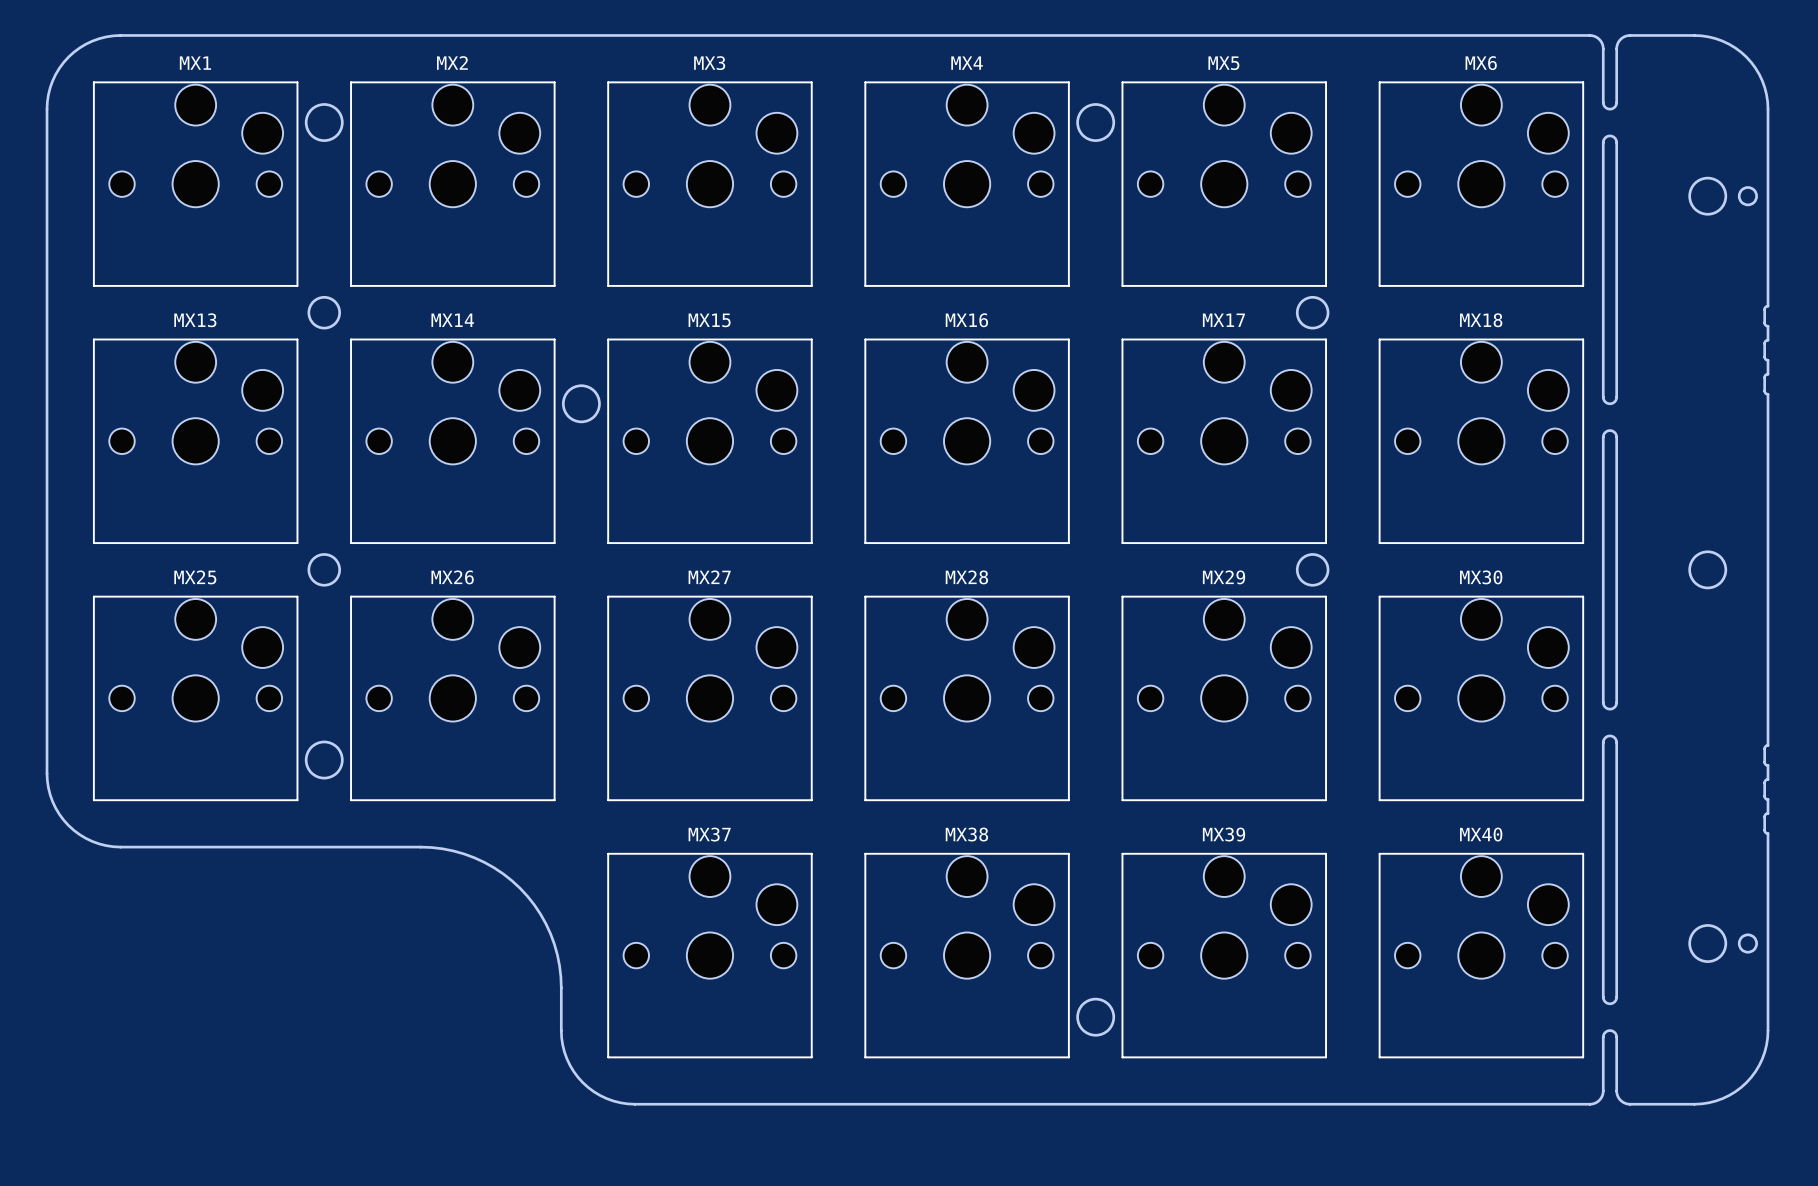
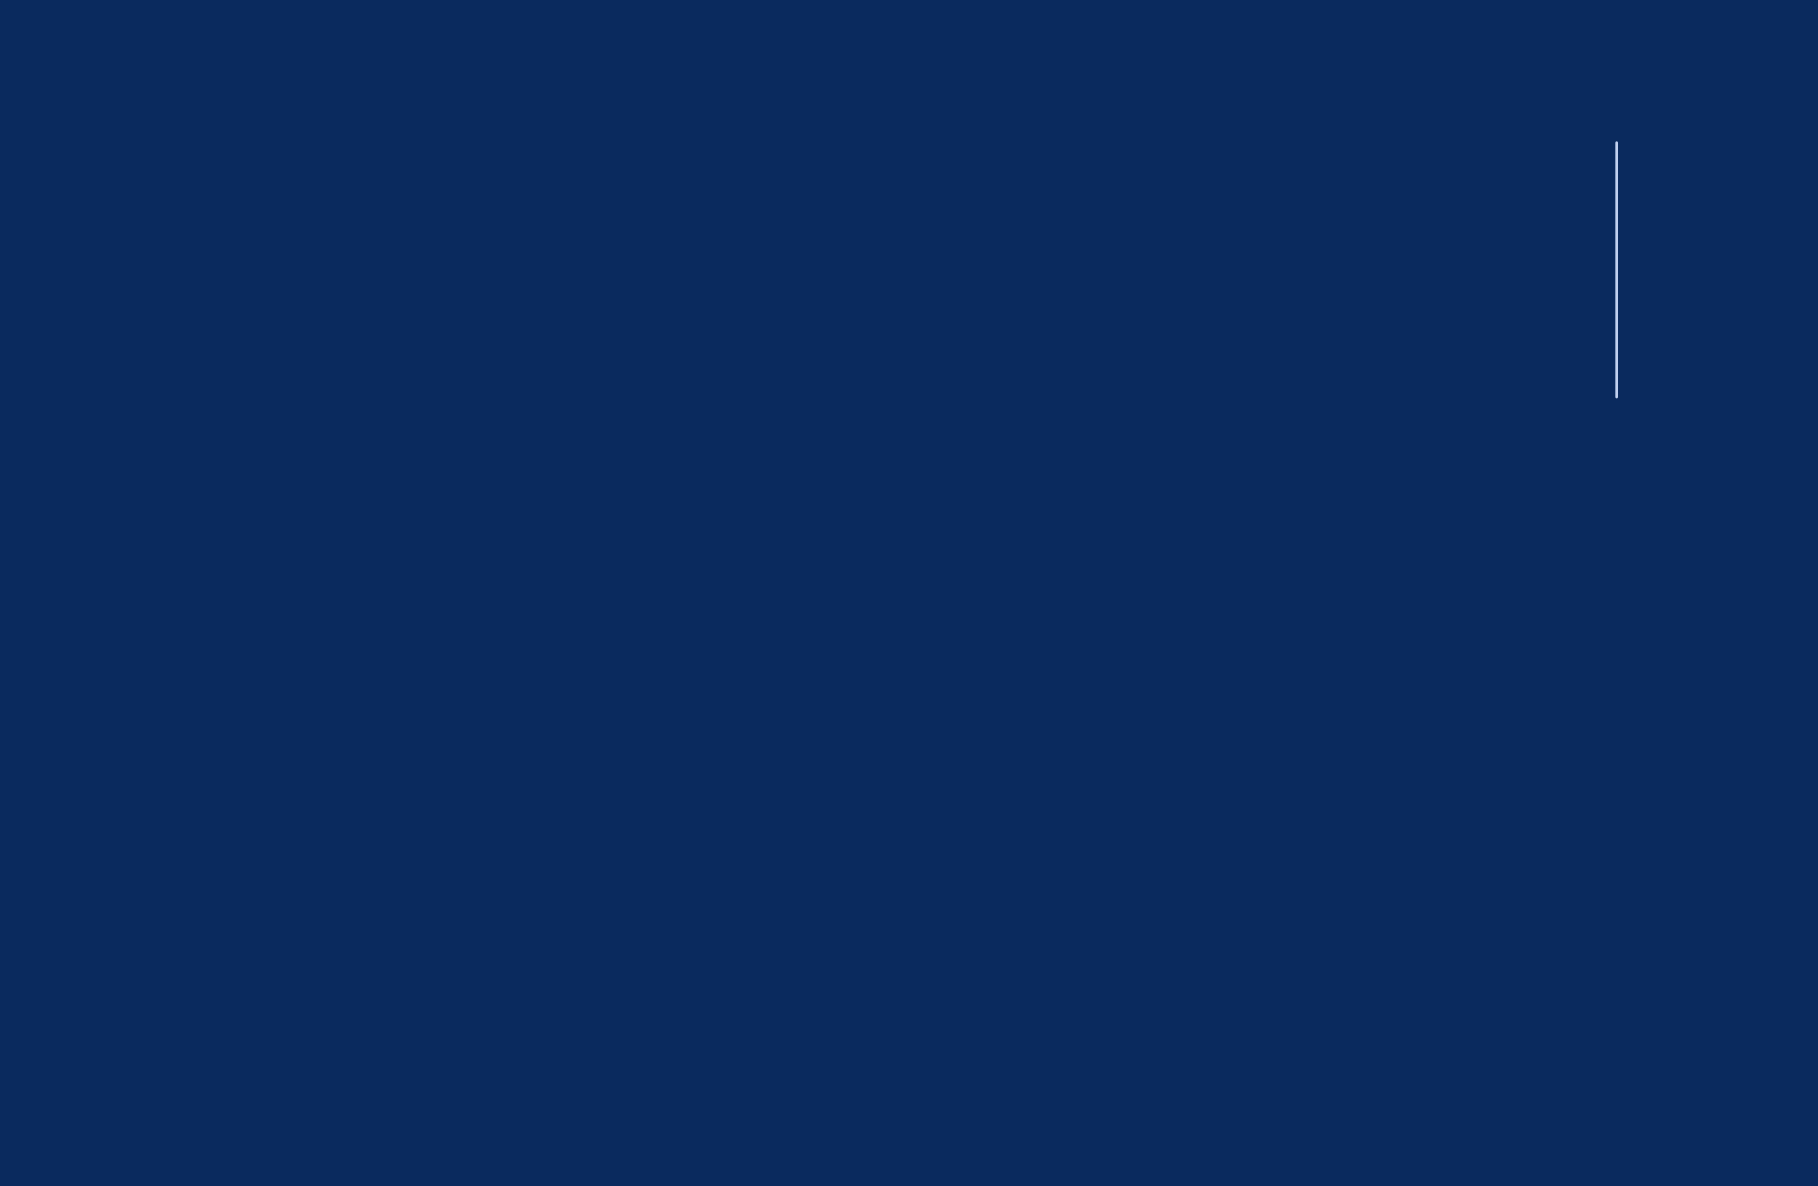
board edge: (120, 35) (1589, 35) (1598, 38) (1602, 45) (1603, 103) (1605, 107) (1609, 109) (1616, 104) (1616, 47) (1619, 40) (1624, 36) (1701, 35) (1715, 38) (1735, 47) (1746, 57) (1759, 74) (1766, 94) (1768, 109) (1768, 306) (1764, 309) (1764, 323) (1768, 326) (1768, 340) (1764, 343) (1764, 357) (1768, 360) (1768, 374) (1764, 377) (1764, 391) (1768, 394) (1768, 745) (1764, 748) (1764, 762) (1768, 765) (1768, 779) (1764, 782) (1764, 796) (1768, 799) (1768, 813) (1764, 816) (1764, 830) (1768, 833) (1768, 1030) (1764, 1051) (1755, 1071) (1735, 1091) (1715, 1101) (1694, 1104) (1627, 1103) (1620, 1100) (1617, 1093) (1616, 1036) (1614, 1032) (1609, 1030) (1605, 1032) (1603, 1036) (1602, 1093) (1599, 1100) (1591, 1104) (627, 1103) (606, 1098) (594, 1091) (582, 1082) (570, 1065) (561, 1037) (560, 976) (557, 954) (550, 933) (540, 914) (520, 888) (503, 873) (484, 862) (453, 850) (431, 847) (120, 847) (99, 843) (79, 834) (68, 825) (55, 808) (48, 787) (47, 773) (47, 101) (52, 80) (68, 57) (92, 41) (120, 35) -> none
round board edge: [304, 103, 344, 142] -> none
round board edge: [1076, 103, 1116, 142] -> none
board edge: (1616, 142) (1614, 138) (1609, 135) (1605, 137) (1603, 142) (1603, 397) (1605, 401) (1609, 403) (1614, 401) (1616, 397) -> none
round board edge: [1688, 176, 1728, 216] -> none
MX1: (195, 184) -> none
MX2: (452, 184) -> none
MX3: (709, 184) -> none
MX4: (967, 184) -> none
MX5: (1224, 184) -> none
MX6: (1481, 184) -> none
round board edge: [1737, 186, 1758, 207] -> none
round board edge: [307, 295, 341, 330] -> none
round board edge: [1295, 295, 1330, 330] -> none
round board edge: [561, 384, 601, 424] -> none
board edge: (1603, 437) (1603, 702) (1605, 707) (1609, 709) (1614, 707) (1616, 702) (1616, 437) (1614, 432) (1609, 430) (1604, 432) (1603, 437) -> none
MX13: (195, 441) -> none
MX14: (452, 441) -> none
MX15: (709, 441) -> none
MX16: (967, 441) -> none
MX17: (1224, 441) -> none
MX18: (1481, 441) -> none
round board edge: [1688, 550, 1728, 590] -> none
round board edge: [307, 553, 341, 587] -> none
round board edge: [1295, 553, 1330, 587] -> none
MX25: (195, 698) -> none
MX26: (452, 698) -> none
MX27: (709, 698) -> none
MX28: (967, 698) -> none
MX29: (1224, 698) -> none
MX30: (1481, 698) -> none
round board edge: [304, 740, 344, 780] -> none
board edge: (1603, 742) (1603, 997) (1605, 1002) (1609, 1003) (1614, 1002) (1616, 997) (1616, 742) (1614, 738) (1609, 735) (1605, 737) (1603, 742) -> none
round board edge: [1688, 924, 1728, 963] -> none
round board edge: [1737, 933, 1758, 954] -> none
MX37: (709, 955) -> none
MX38: (967, 955) -> none
MX39: (1224, 955) -> none
MX40: (1481, 955) -> none
round board edge: [1076, 997, 1116, 1037] -> none

